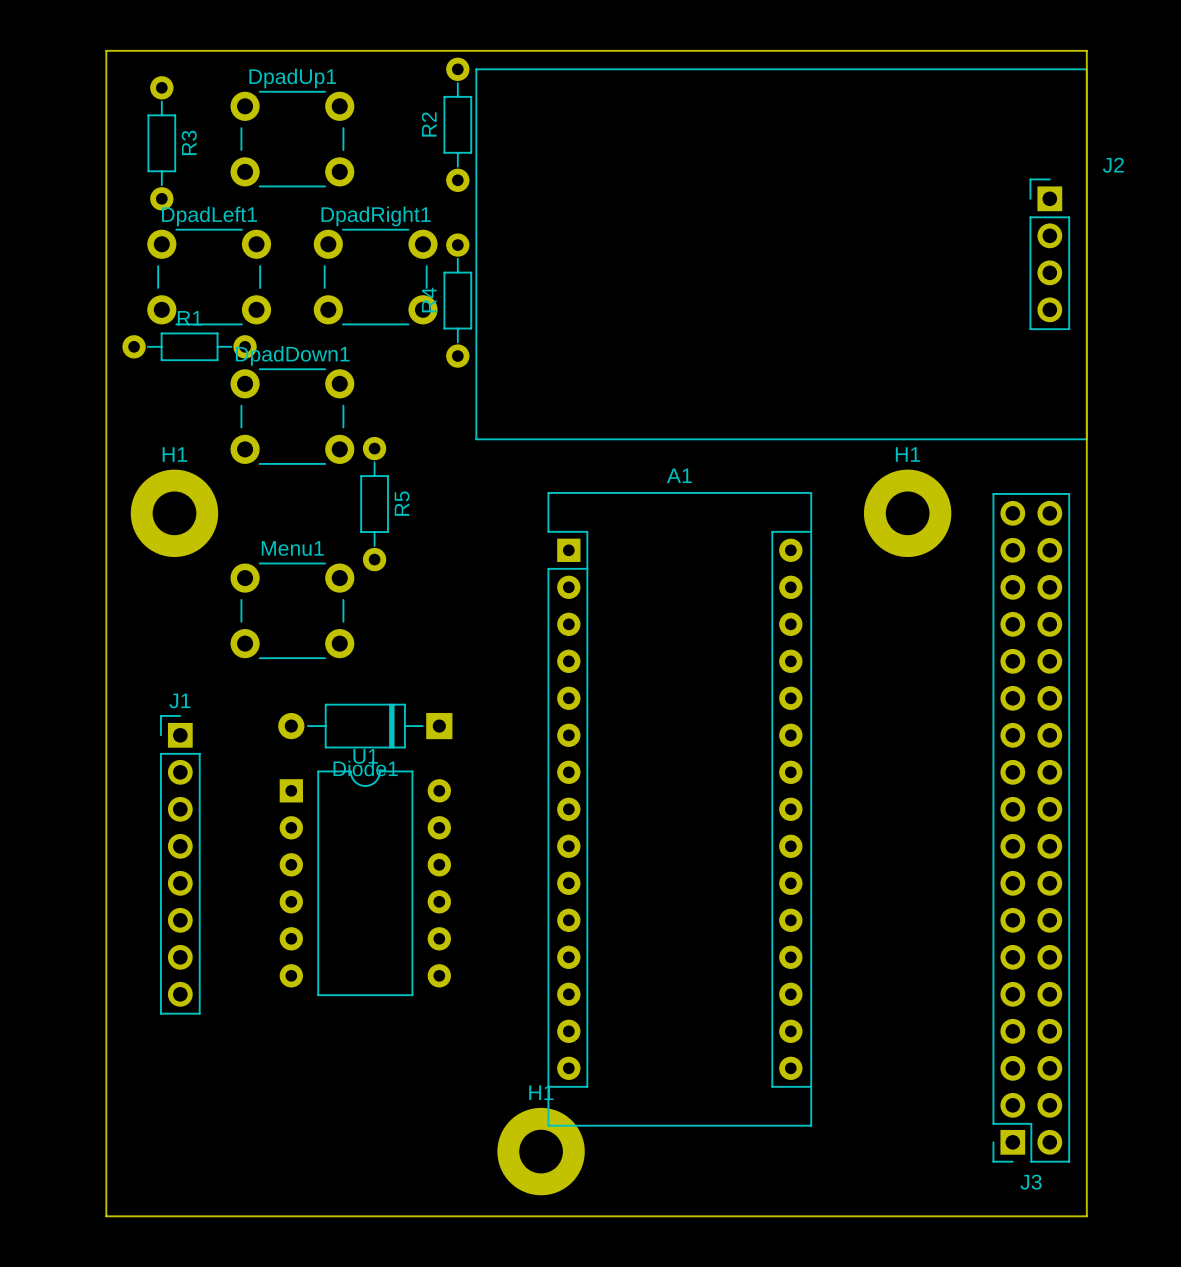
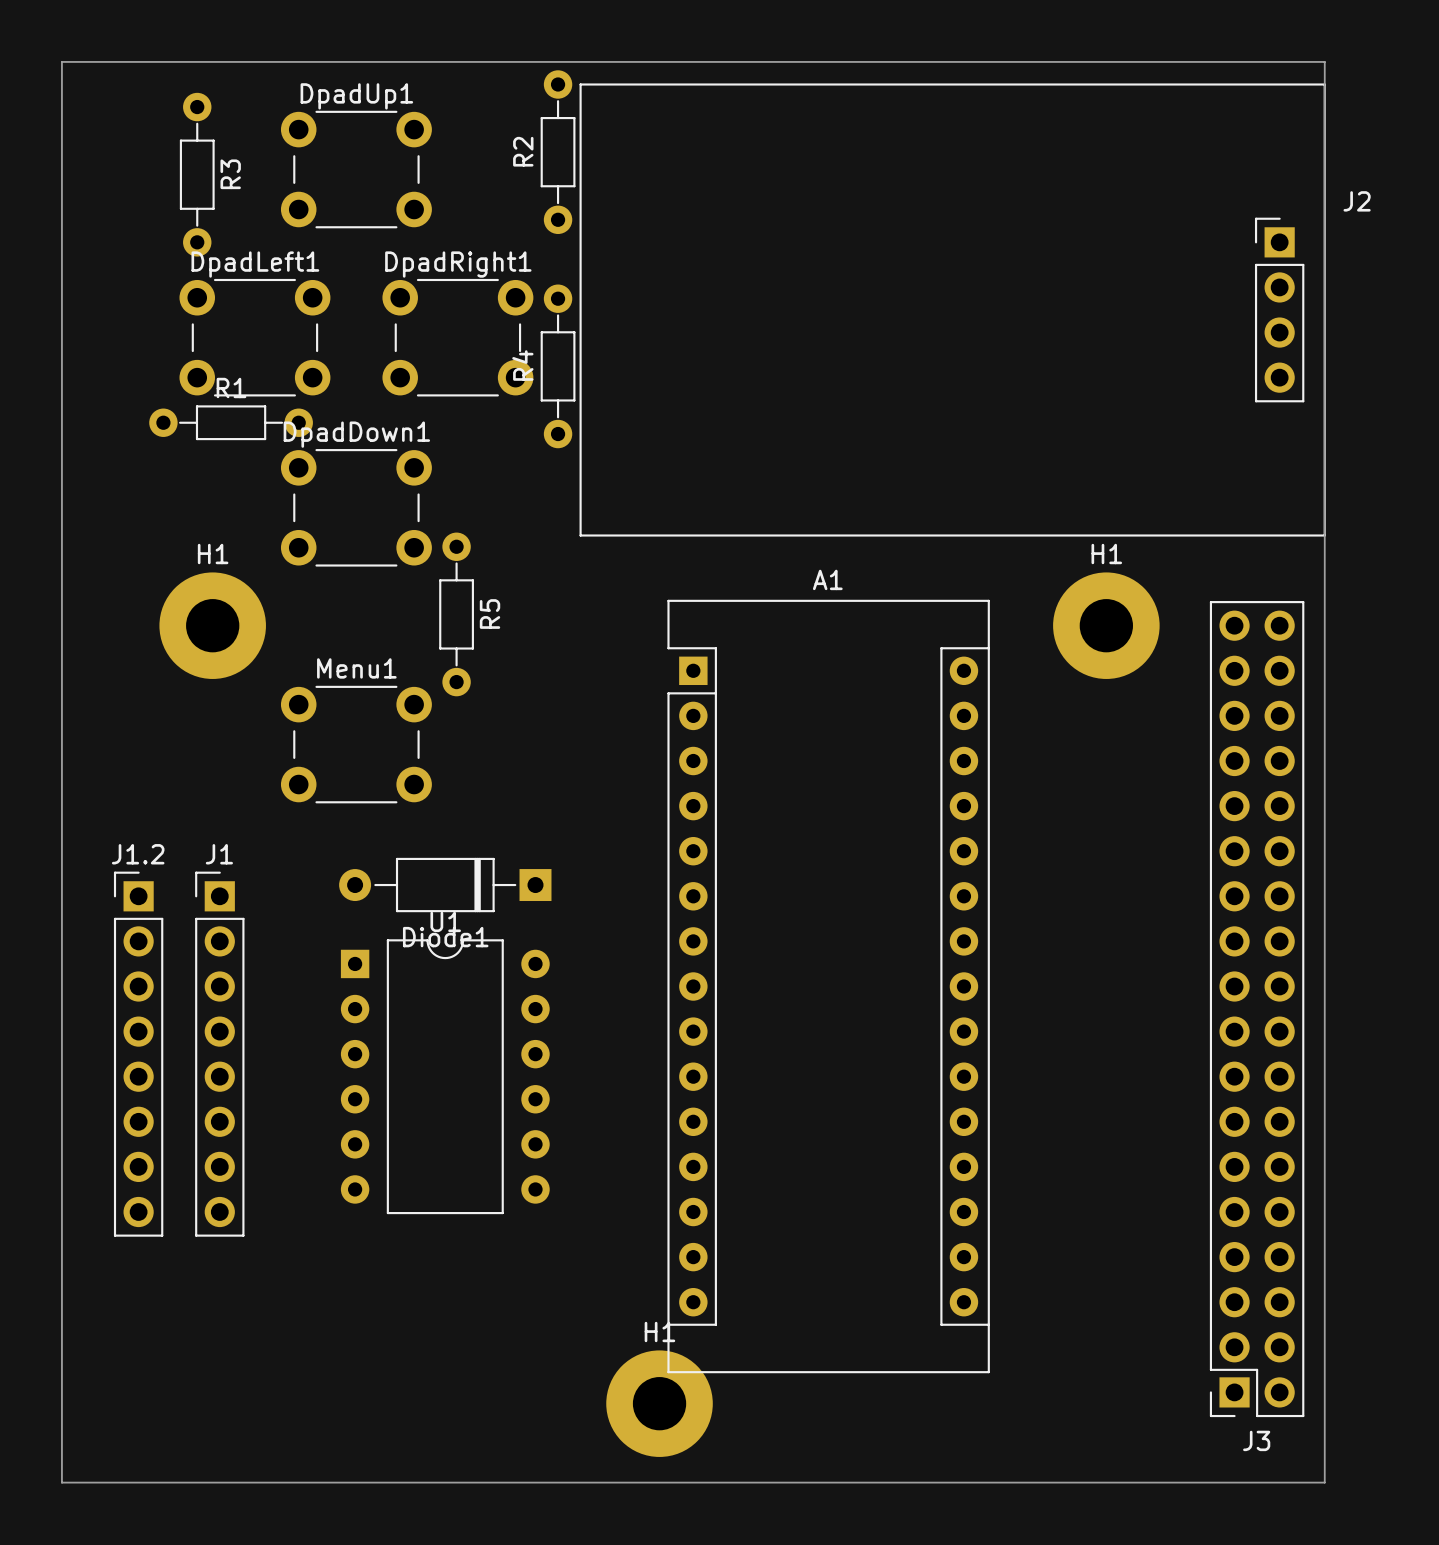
board edge: (106, 50) (106, 1216) -> (129, 61) (61, 61) (61, 1482) (129, 1482)
J1.2: none -> (138, 1054)

